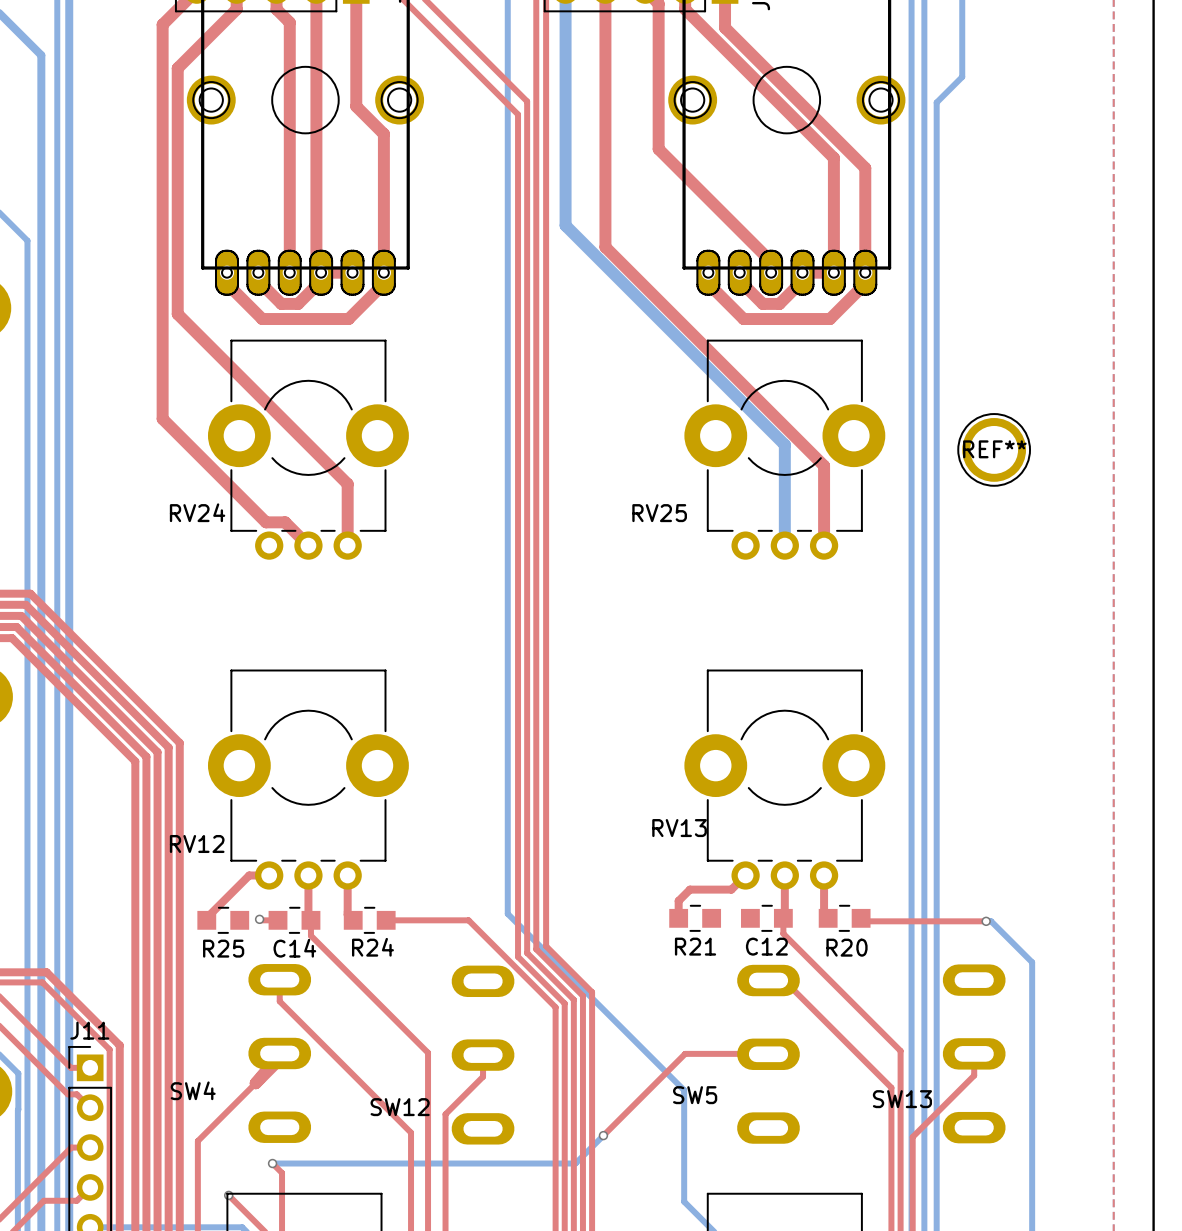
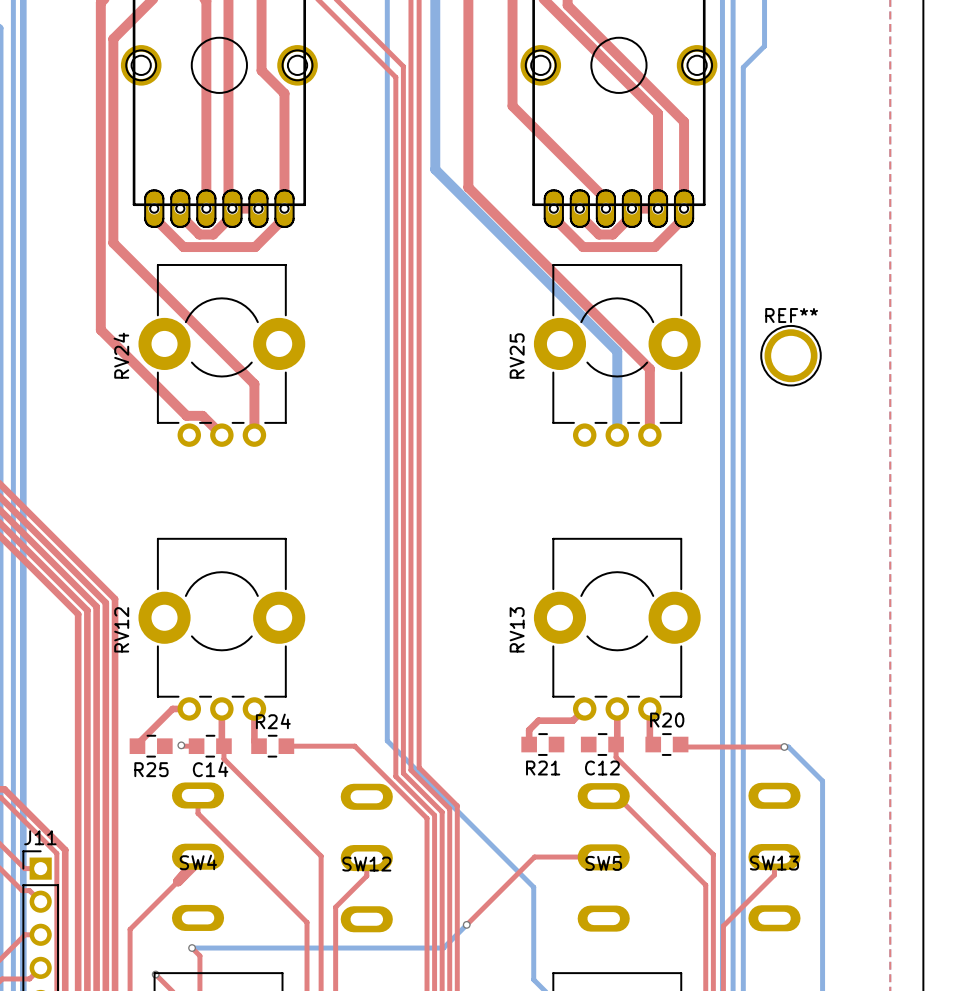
REF** name position: REF** (994, 449) -> REF** (791, 315)
RV24 name rotation: 0° (197, 512) -> 90° counterclockwise (121, 355)
RV25 name rotation: 0° (659, 513) -> 90° counterclockwise (517, 356)
RV13 name rotation: 0° (679, 828) -> 90° counterclockwise (517, 629)
RV12 name rotation: 0° (197, 844) -> 90° counterclockwise (121, 629)
R24 name position: R24 (372, 947) -> R24 (273, 721)
R20 name position: R20 (847, 947) -> R20 (667, 720)
SW4 name position: SW4 (193, 1090) -> SW4 (198, 862)
SW5 name position: SW5 (695, 1095) -> SW5 (603, 863)
SW13 name position: SW13 (902, 1099) -> SW13 (774, 863)
SW12 name position: SW12 (400, 1107) -> SW12 (366, 864)

